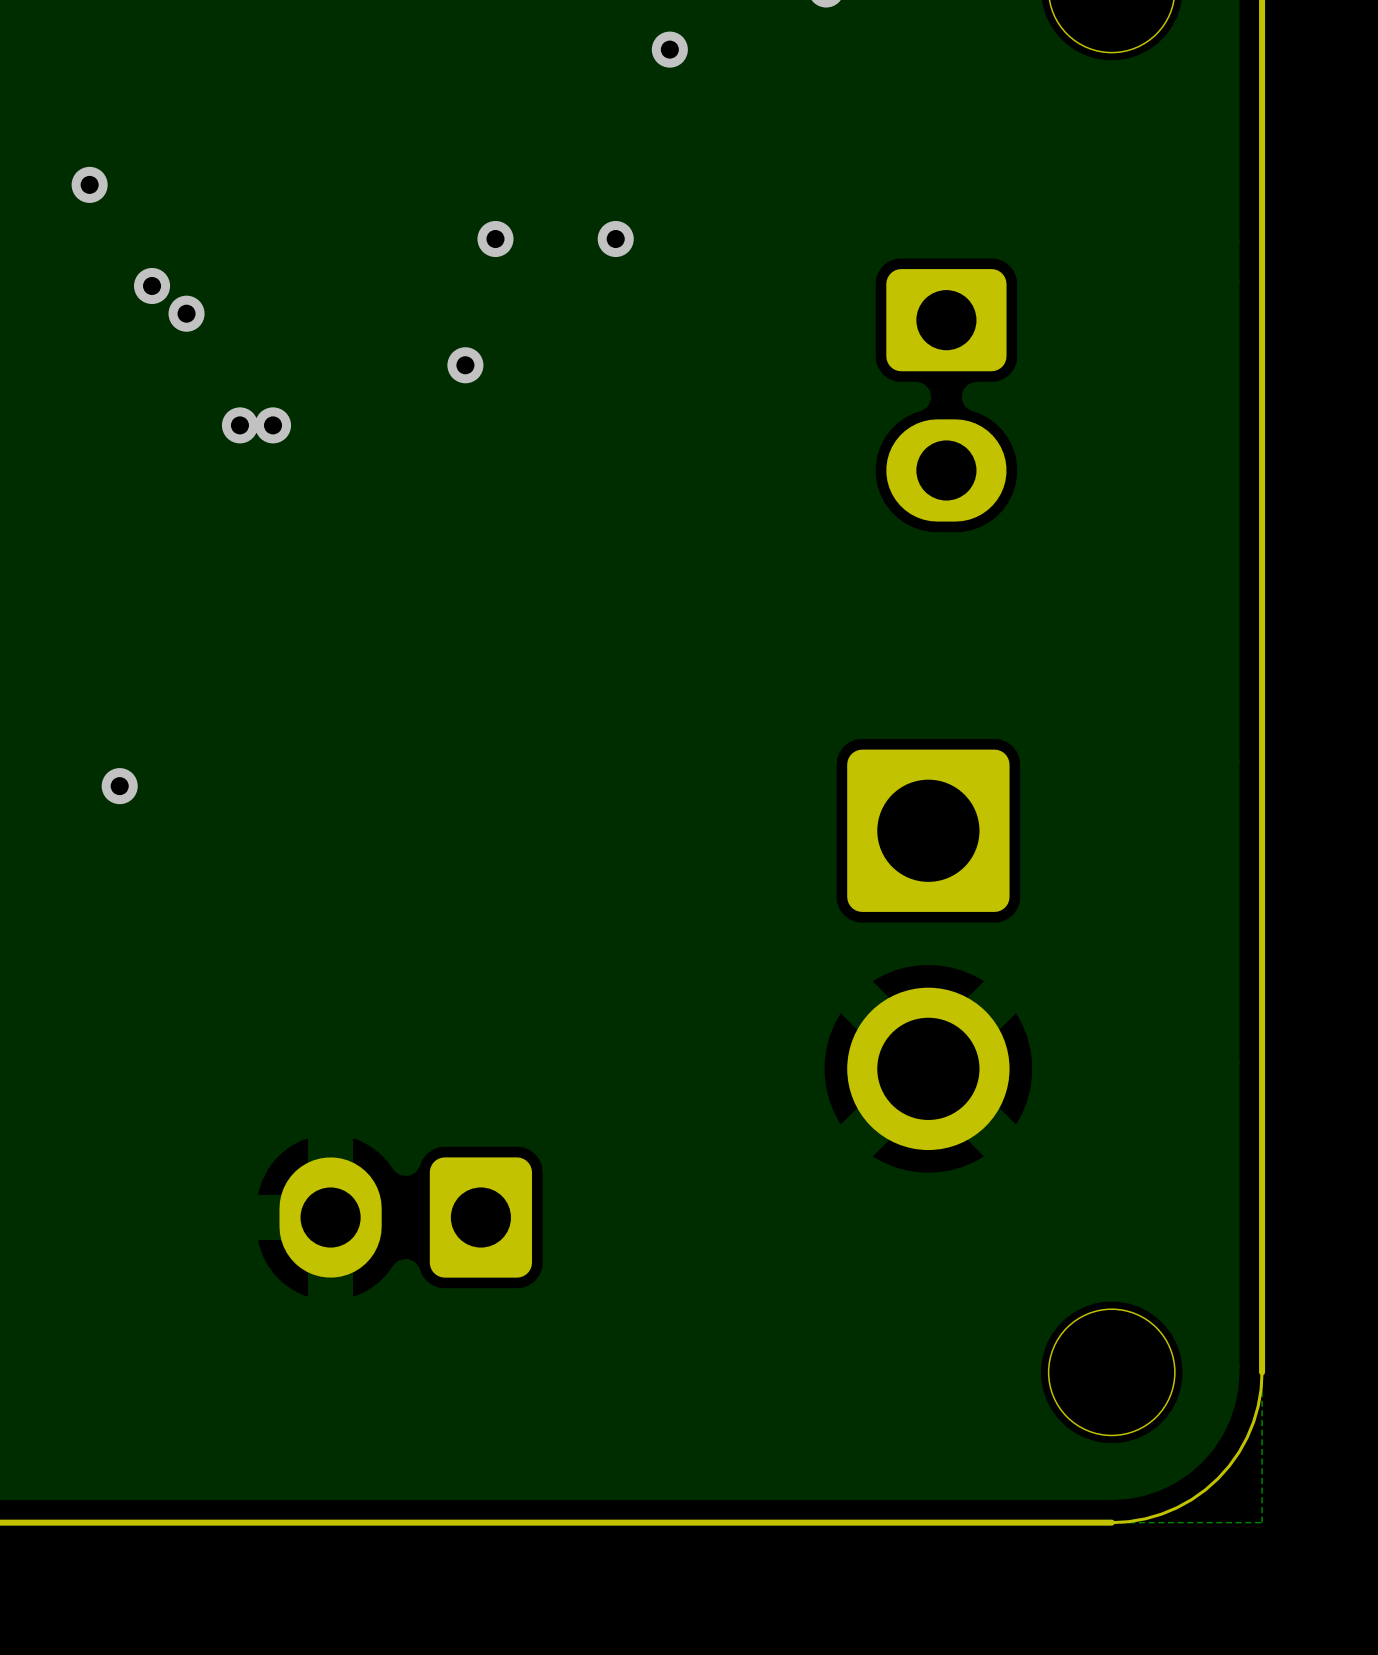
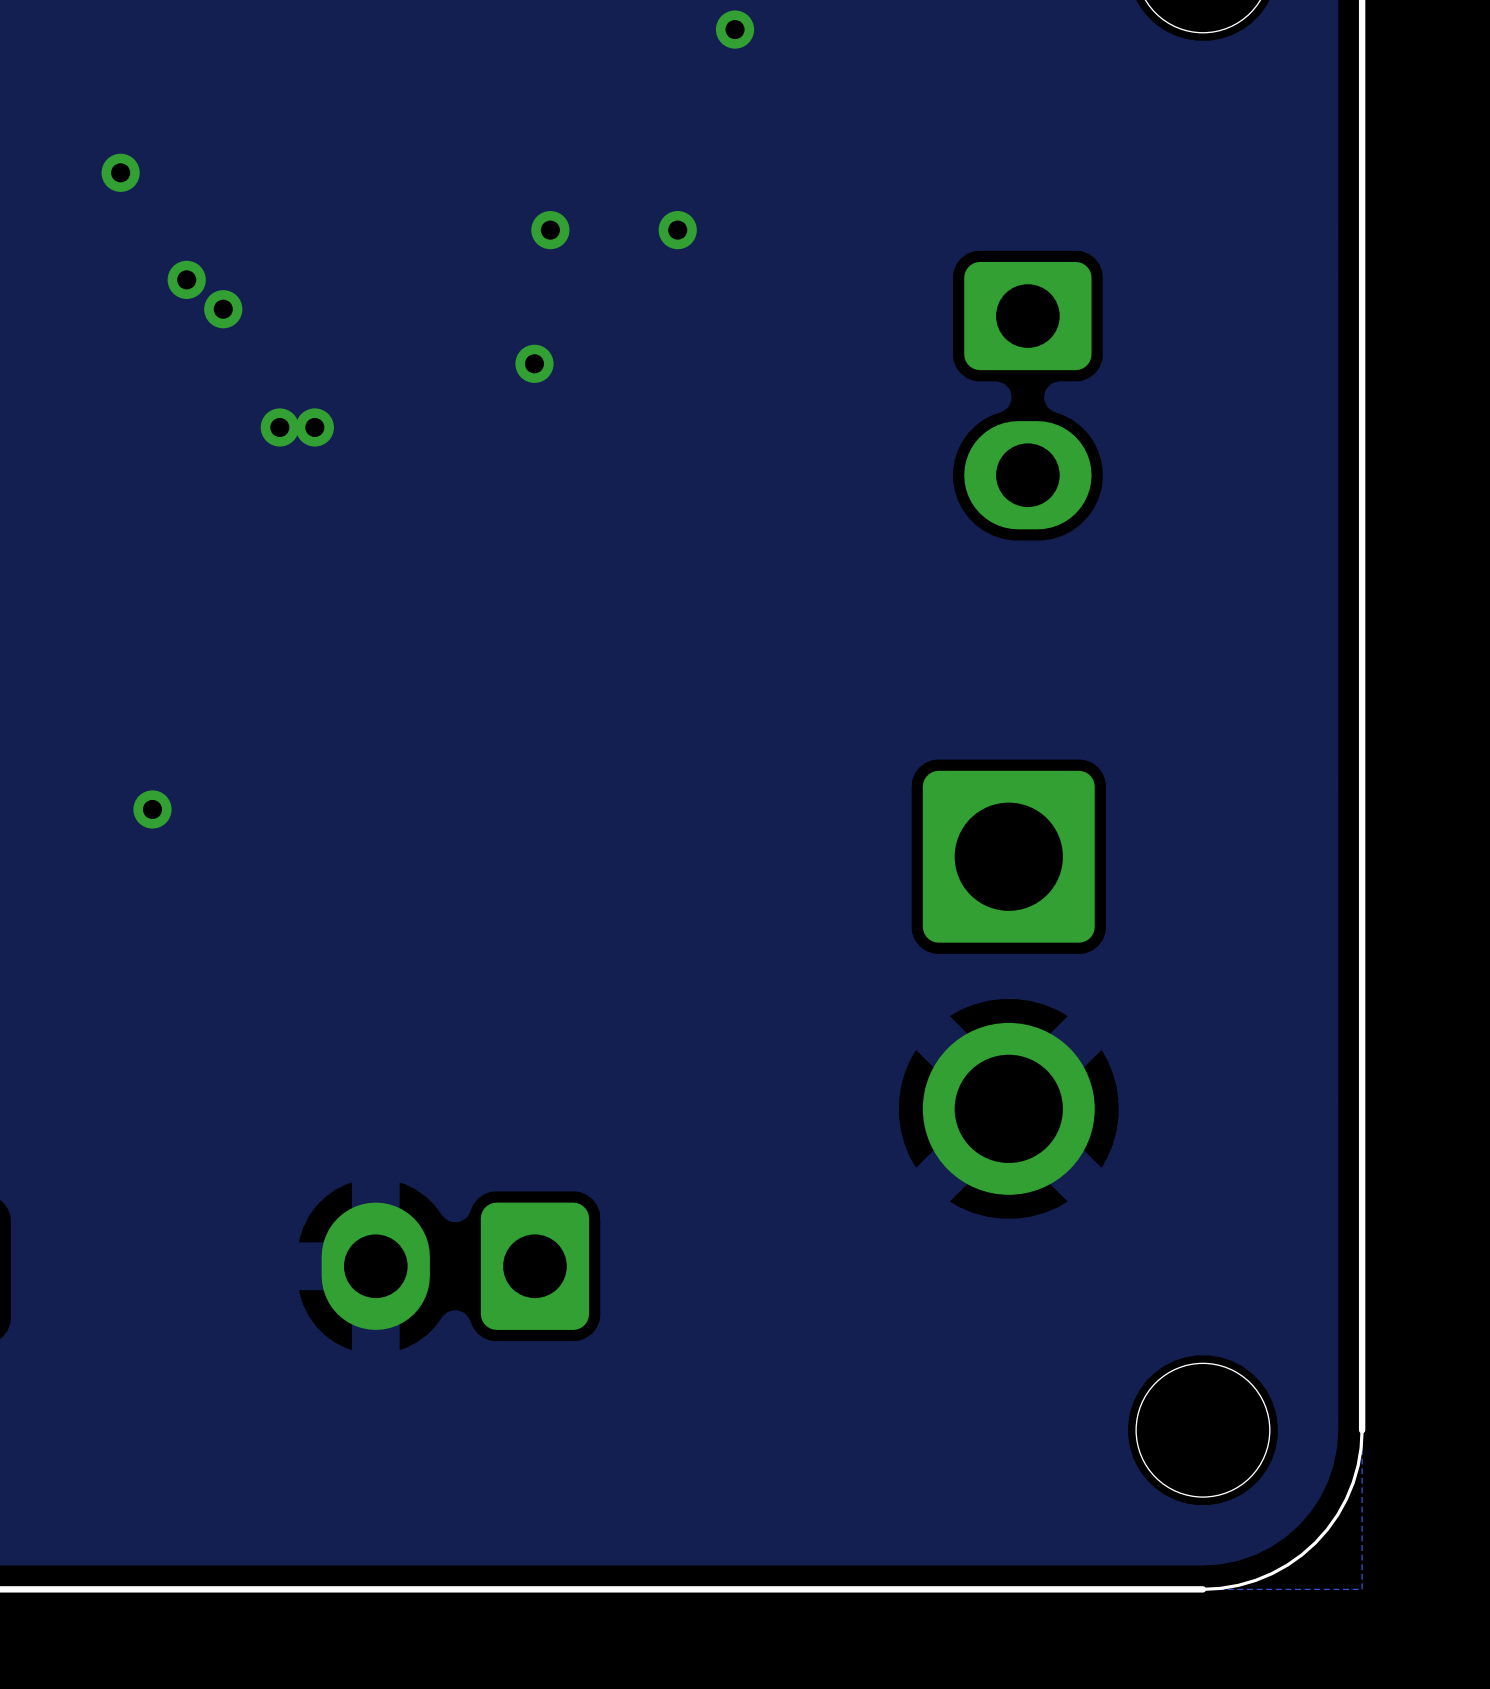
via position: (465, 365) -> (534, 363)

